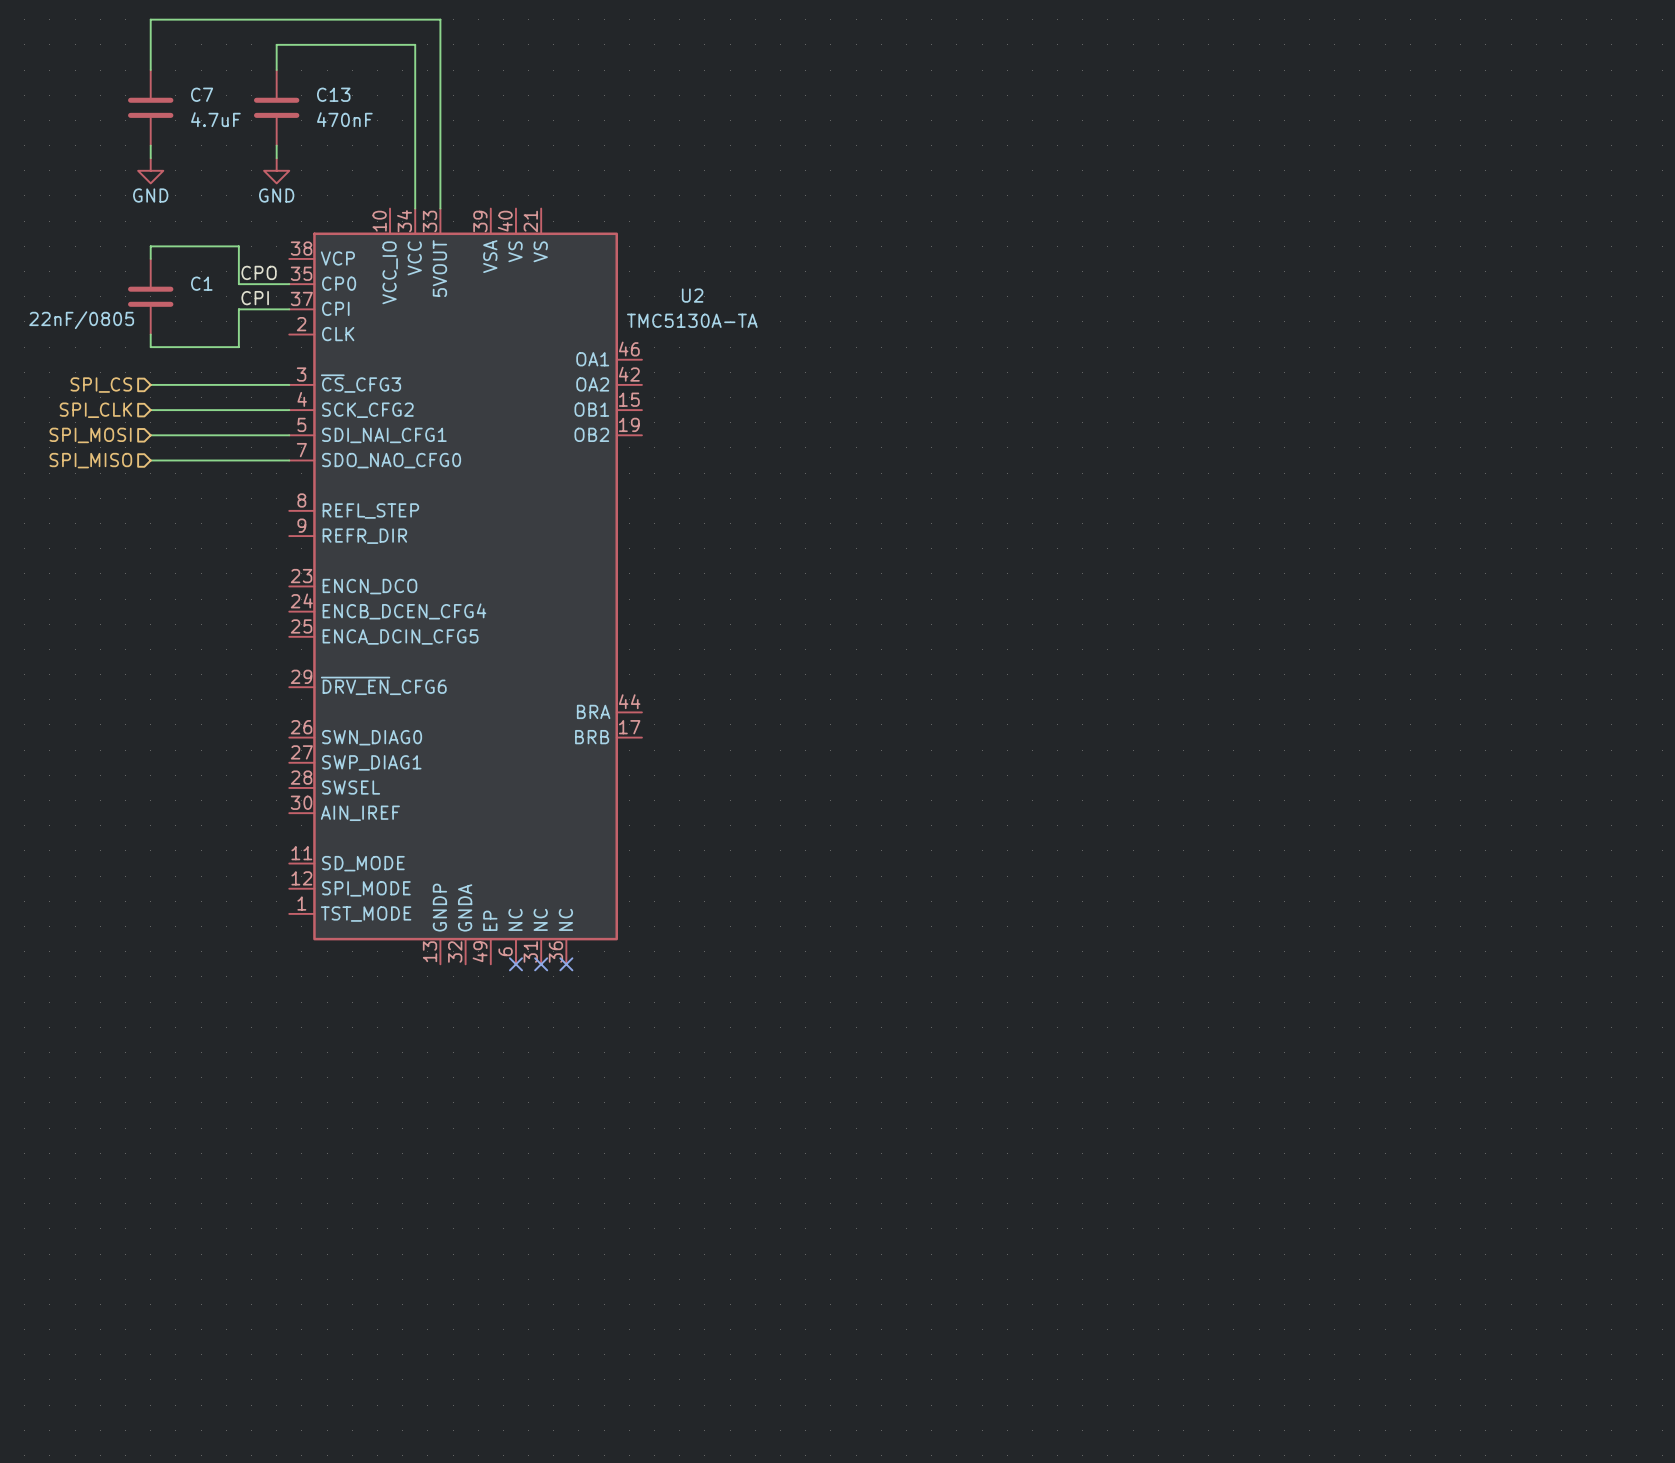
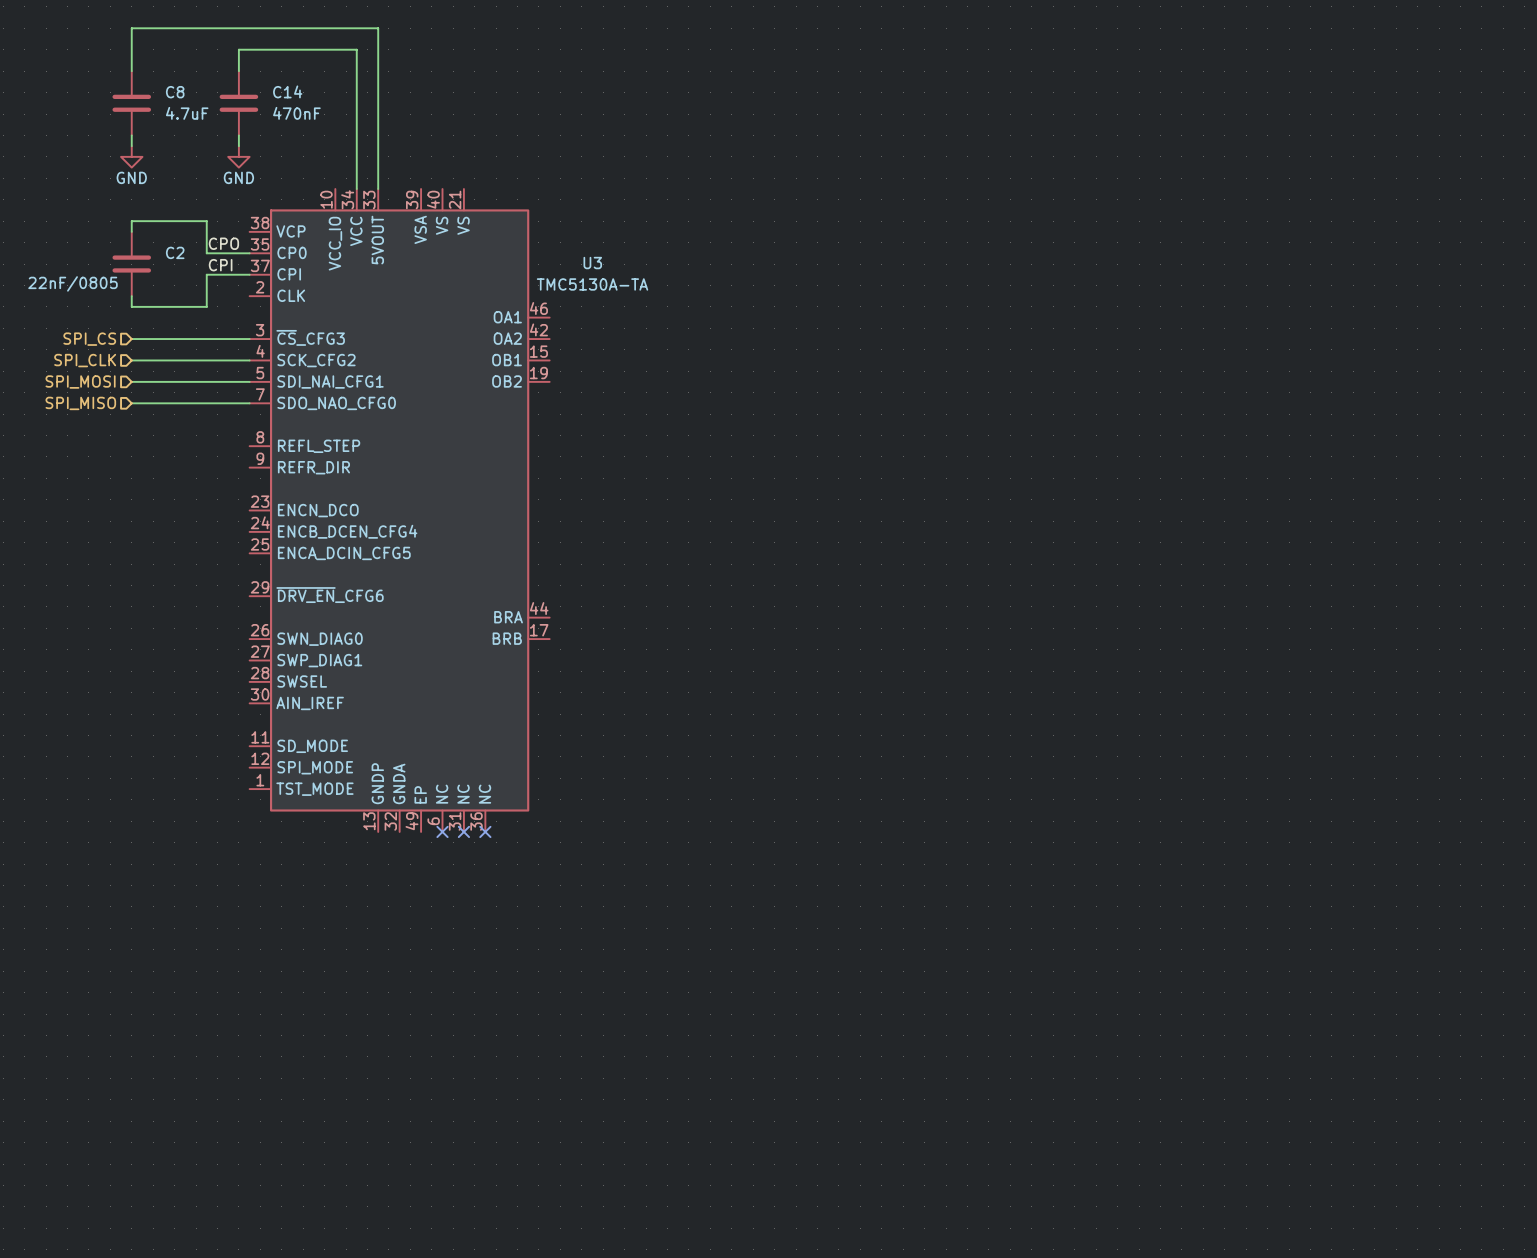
C7 name: C7 (202, 94) -> C8 (175, 92)
C13 name: C13 (333, 94) -> C14 (287, 91)
C1 name: C1 (201, 283) -> C2 (175, 252)
U2 name: U2 (692, 295) -> U3 (592, 263)

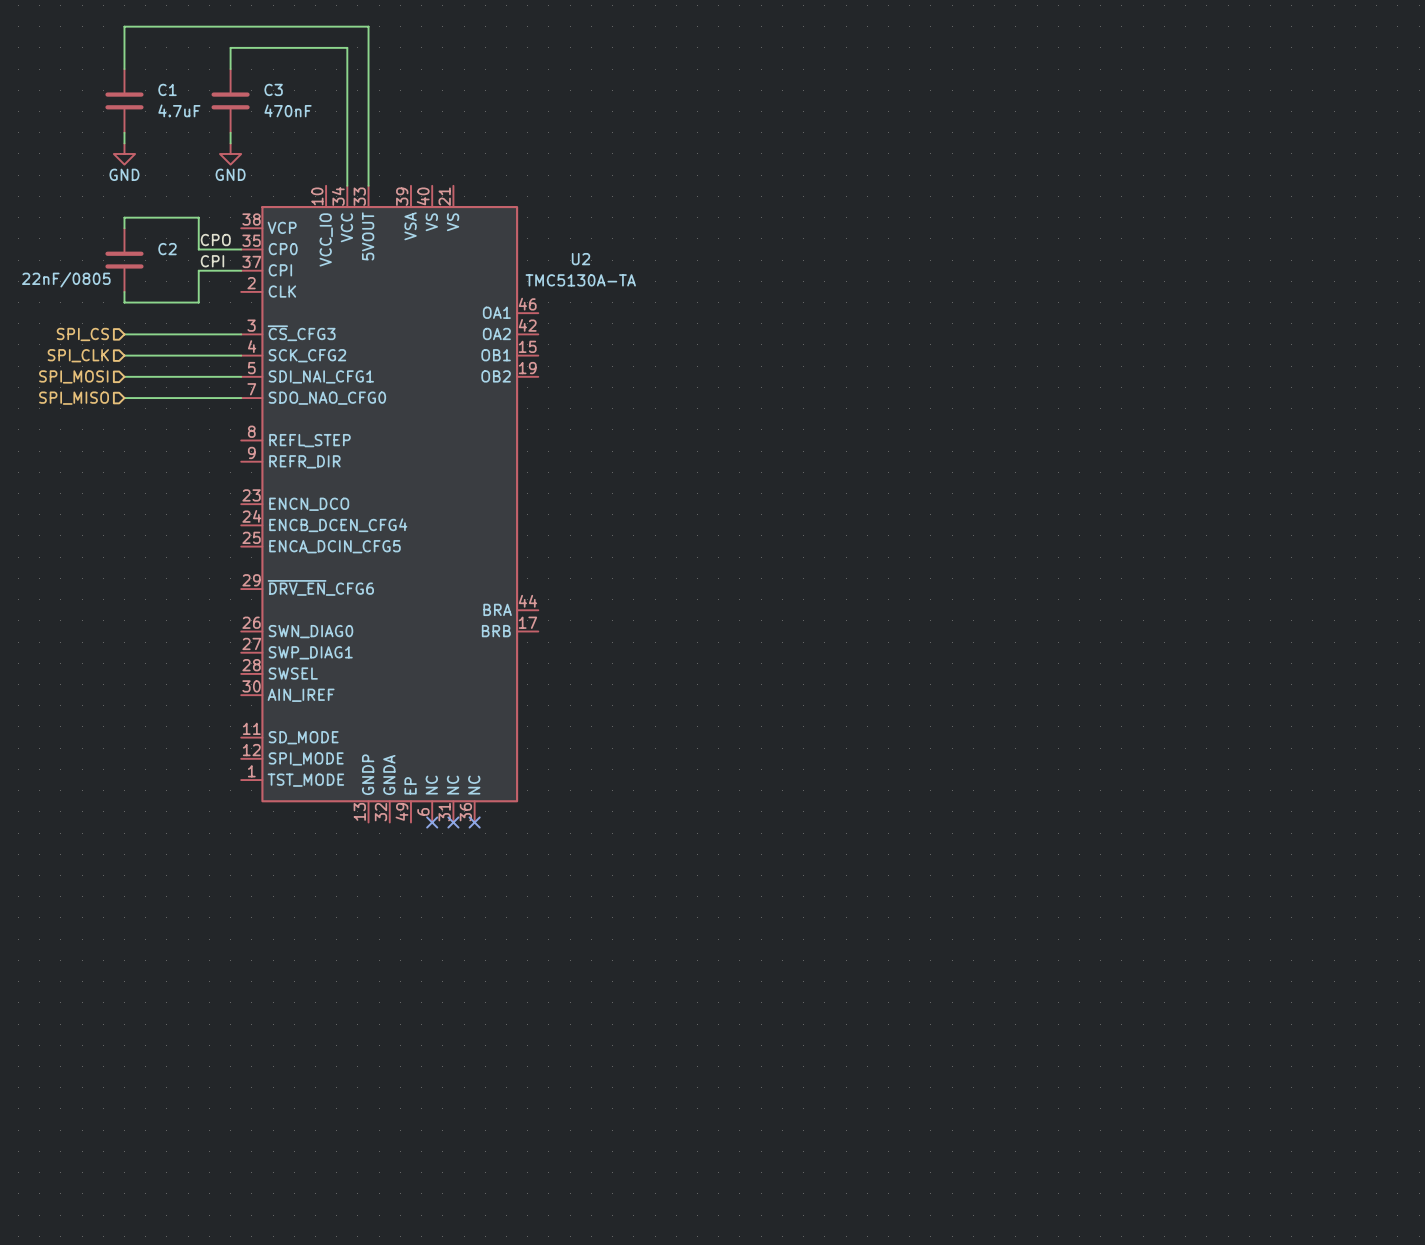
C14 name: C14 (287, 91) -> C3 (273, 89)
C8 name: C8 (175, 92) -> C1 (167, 89)
U3 name: U3 (592, 263) -> U2 (581, 259)

